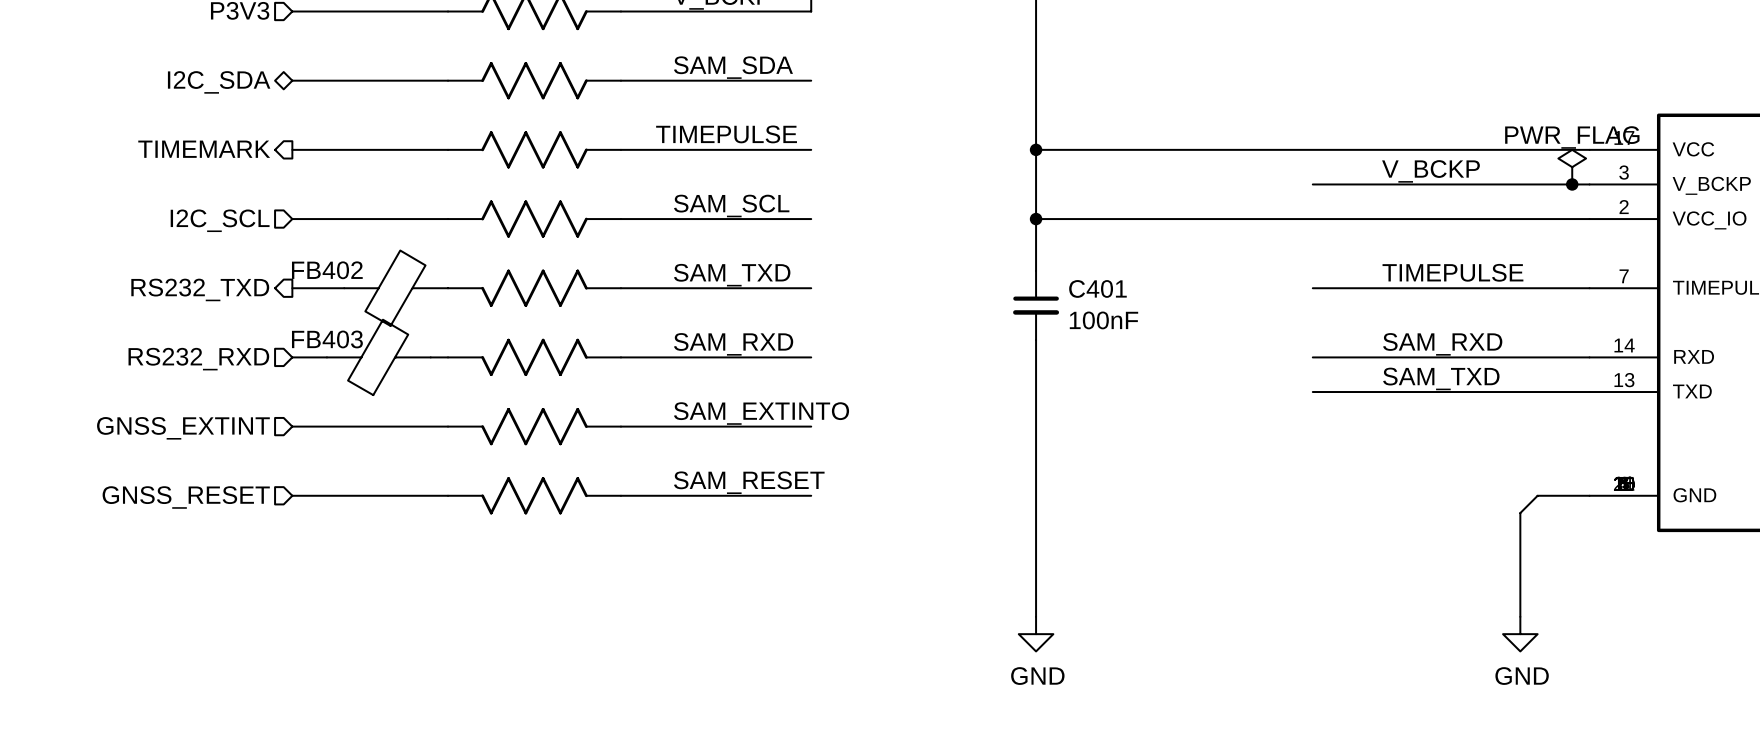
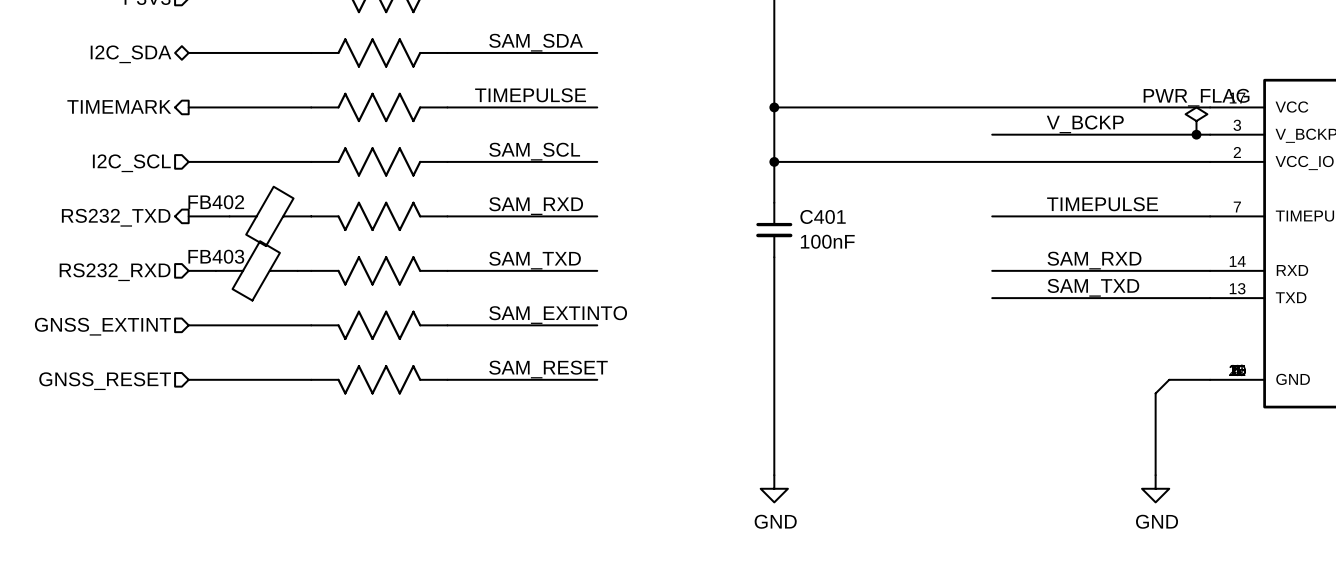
label: SAM_TXD (732, 275) -> SAM_RXD (536, 206)
label: SAM_RXD (733, 344) -> SAM_TXD (535, 260)

